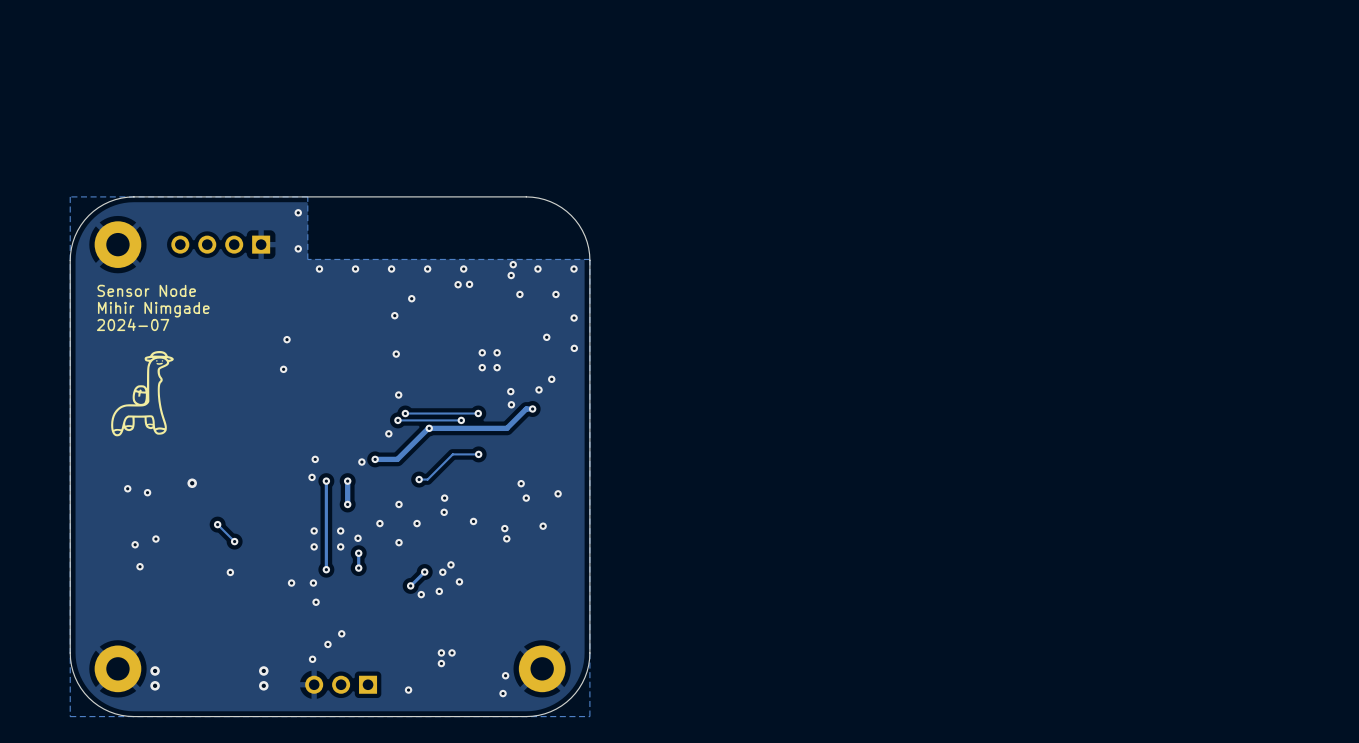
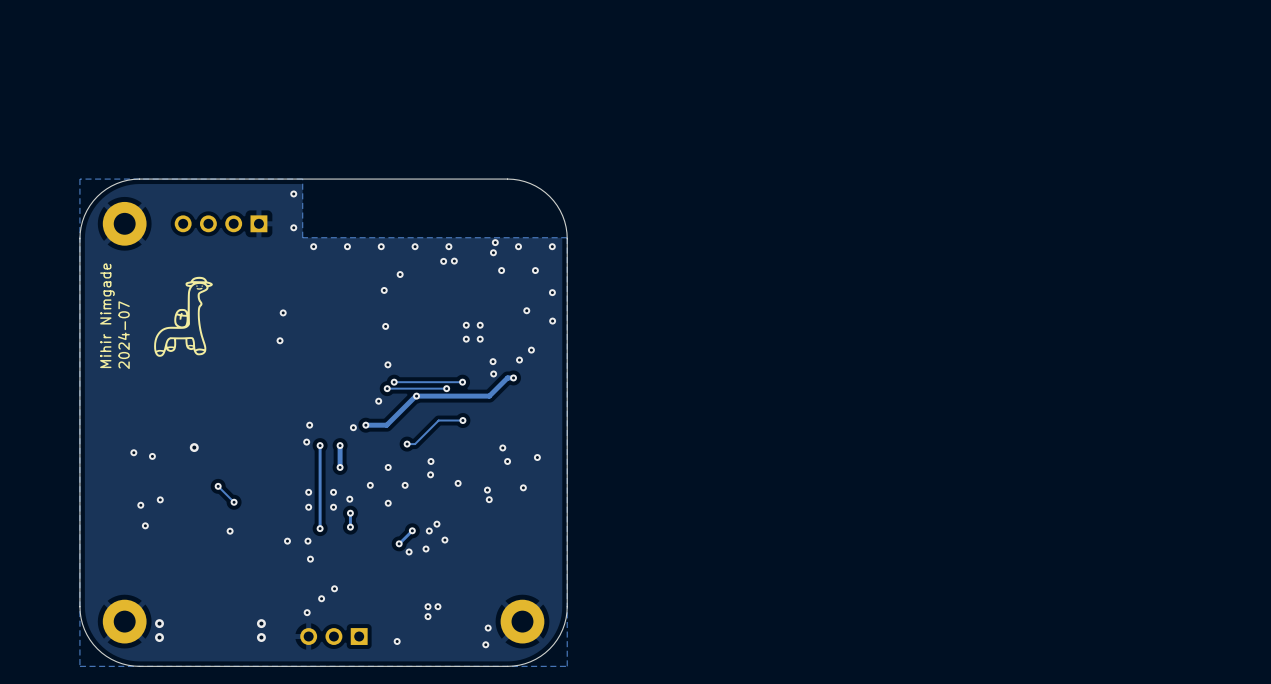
text: Sensor Node (146, 290) -> none
text rotation: 0° (153, 309) -> 90° counterclockwise (107, 315)
text rotation: 0° (133, 324) -> 90° counterclockwise (123, 335)
drawing position: (142, 393) -> (183, 316)

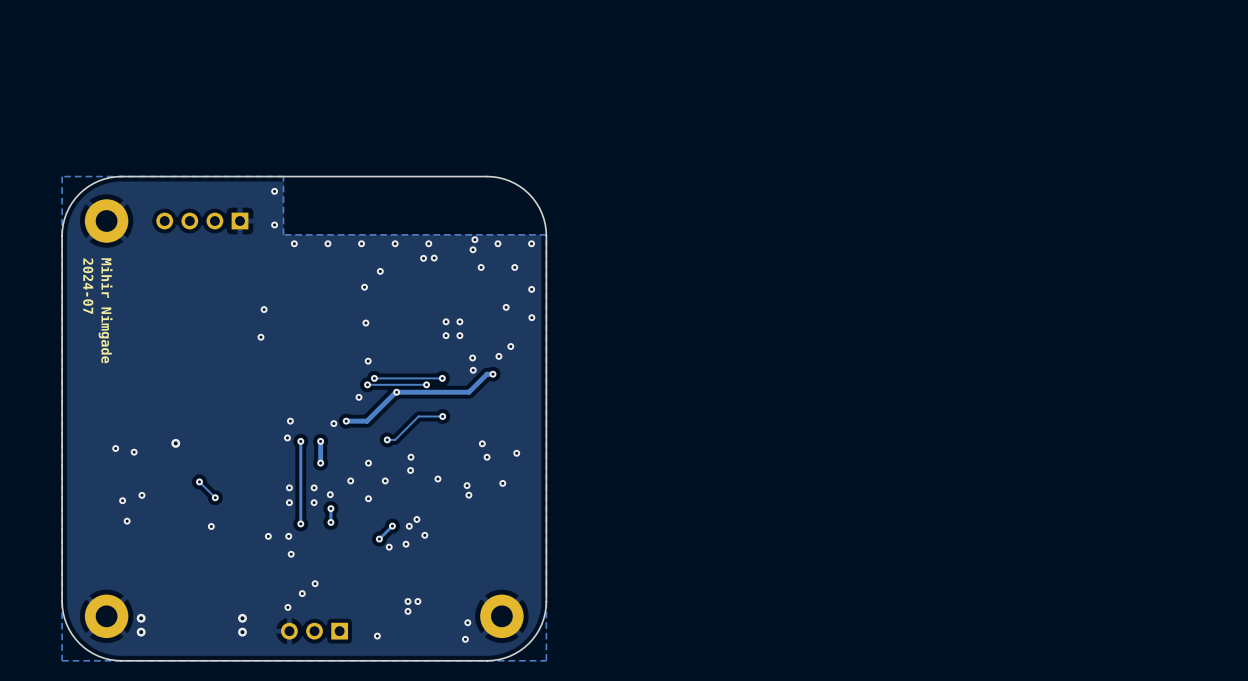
drawing: [154, 276, 213, 357] -> none
text rotation: 0° (107, 315) -> 180° (105, 310)
text rotation: 0° (123, 335) -> 180° (88, 286)

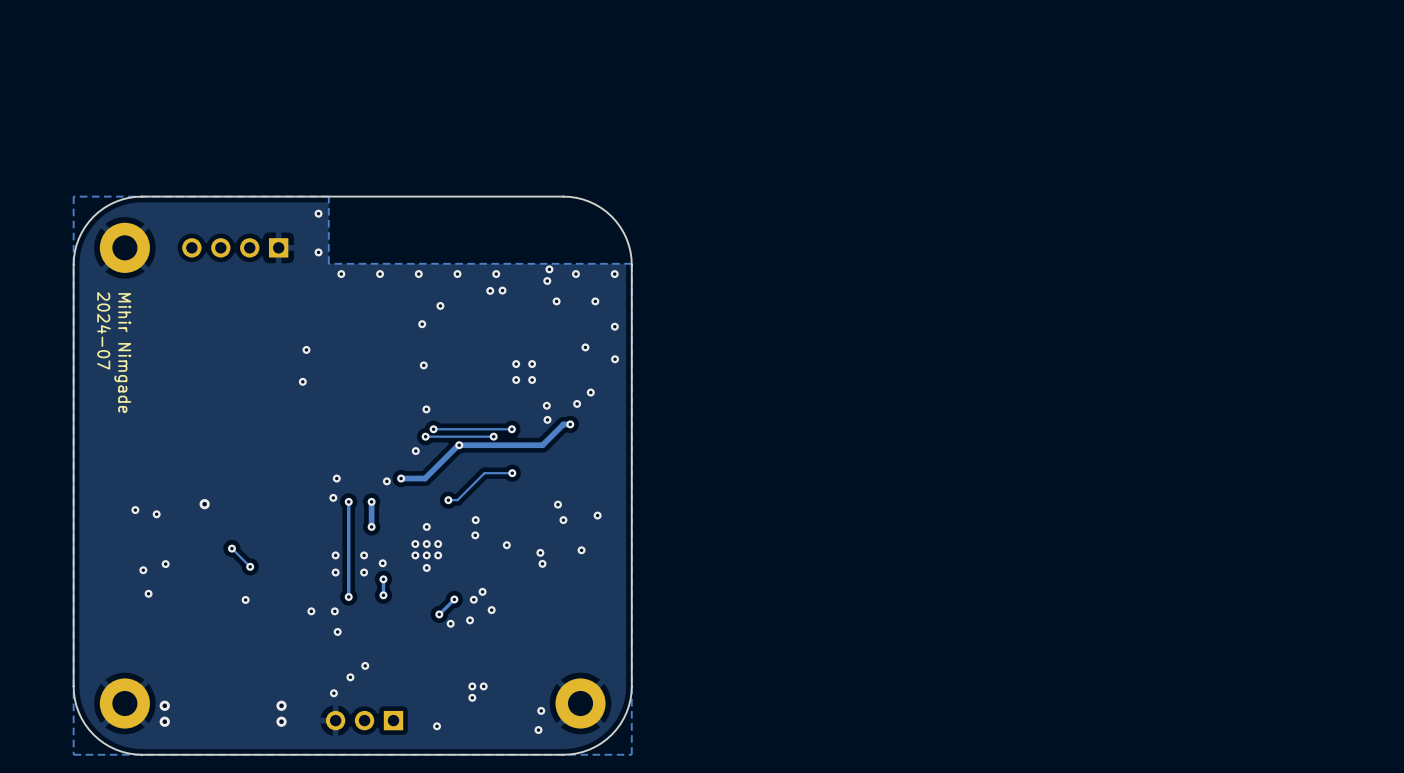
via: none -> (415, 544)
via: none -> (426, 544)
via: none -> (438, 544)
via: (350, 480) -> none
via: (385, 480) -> none
via: none -> (415, 555)
via: none -> (426, 555)
via: none -> (438, 555)

